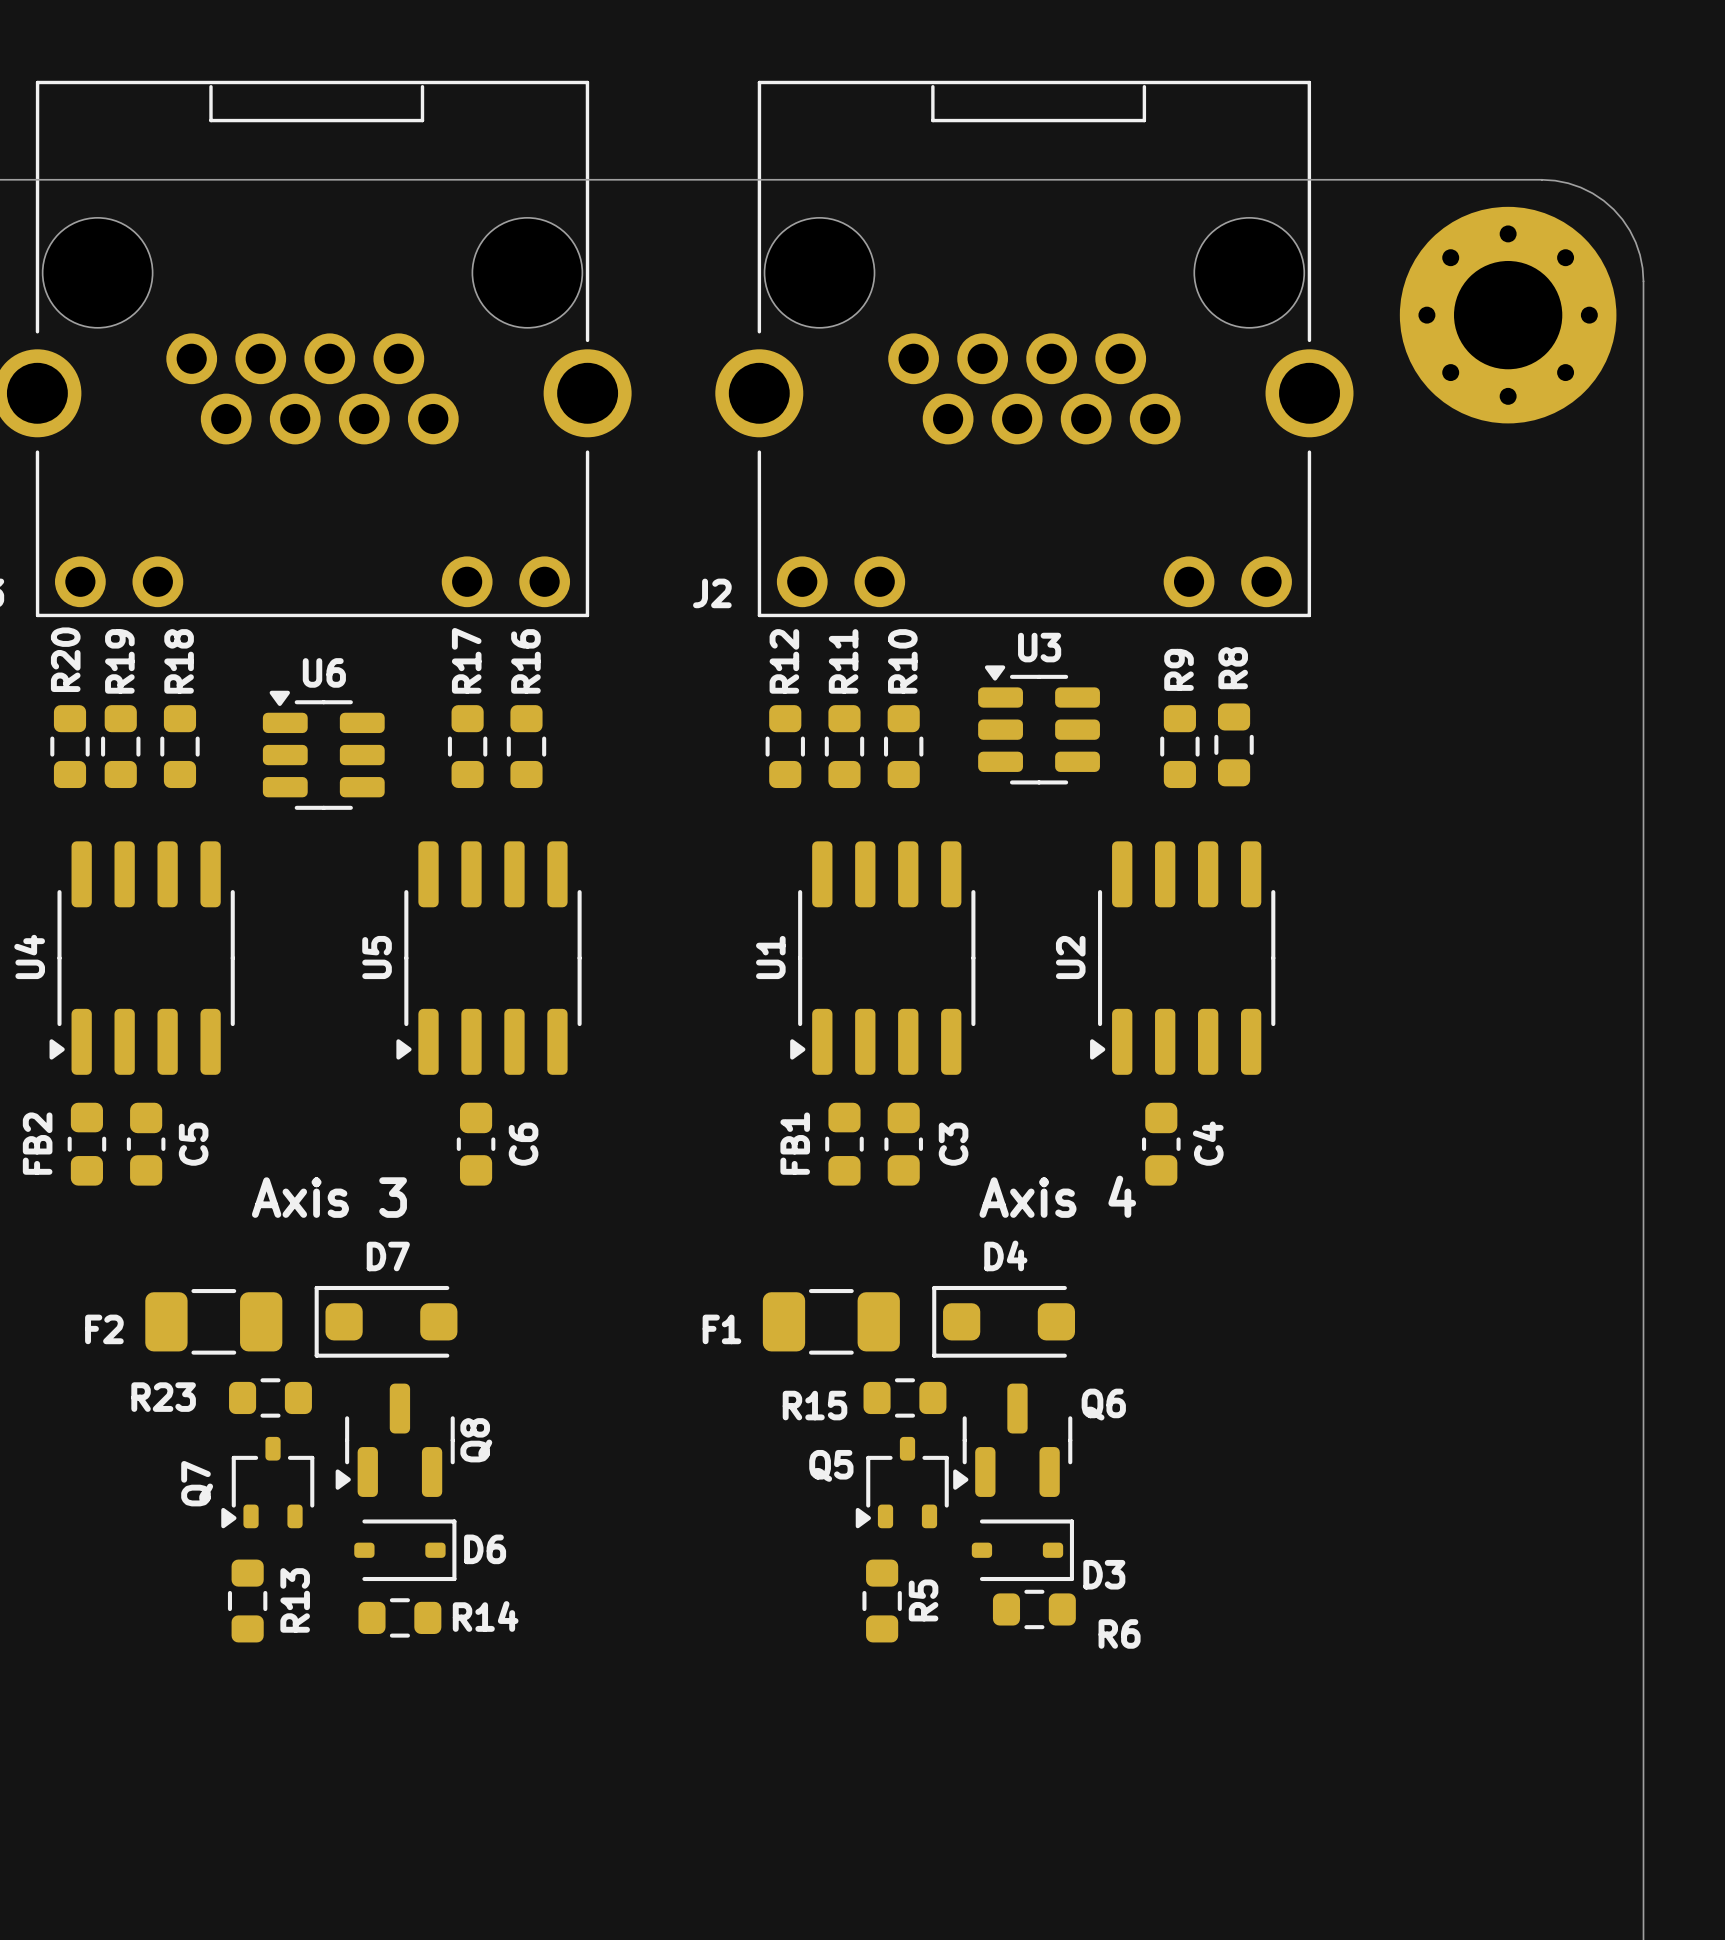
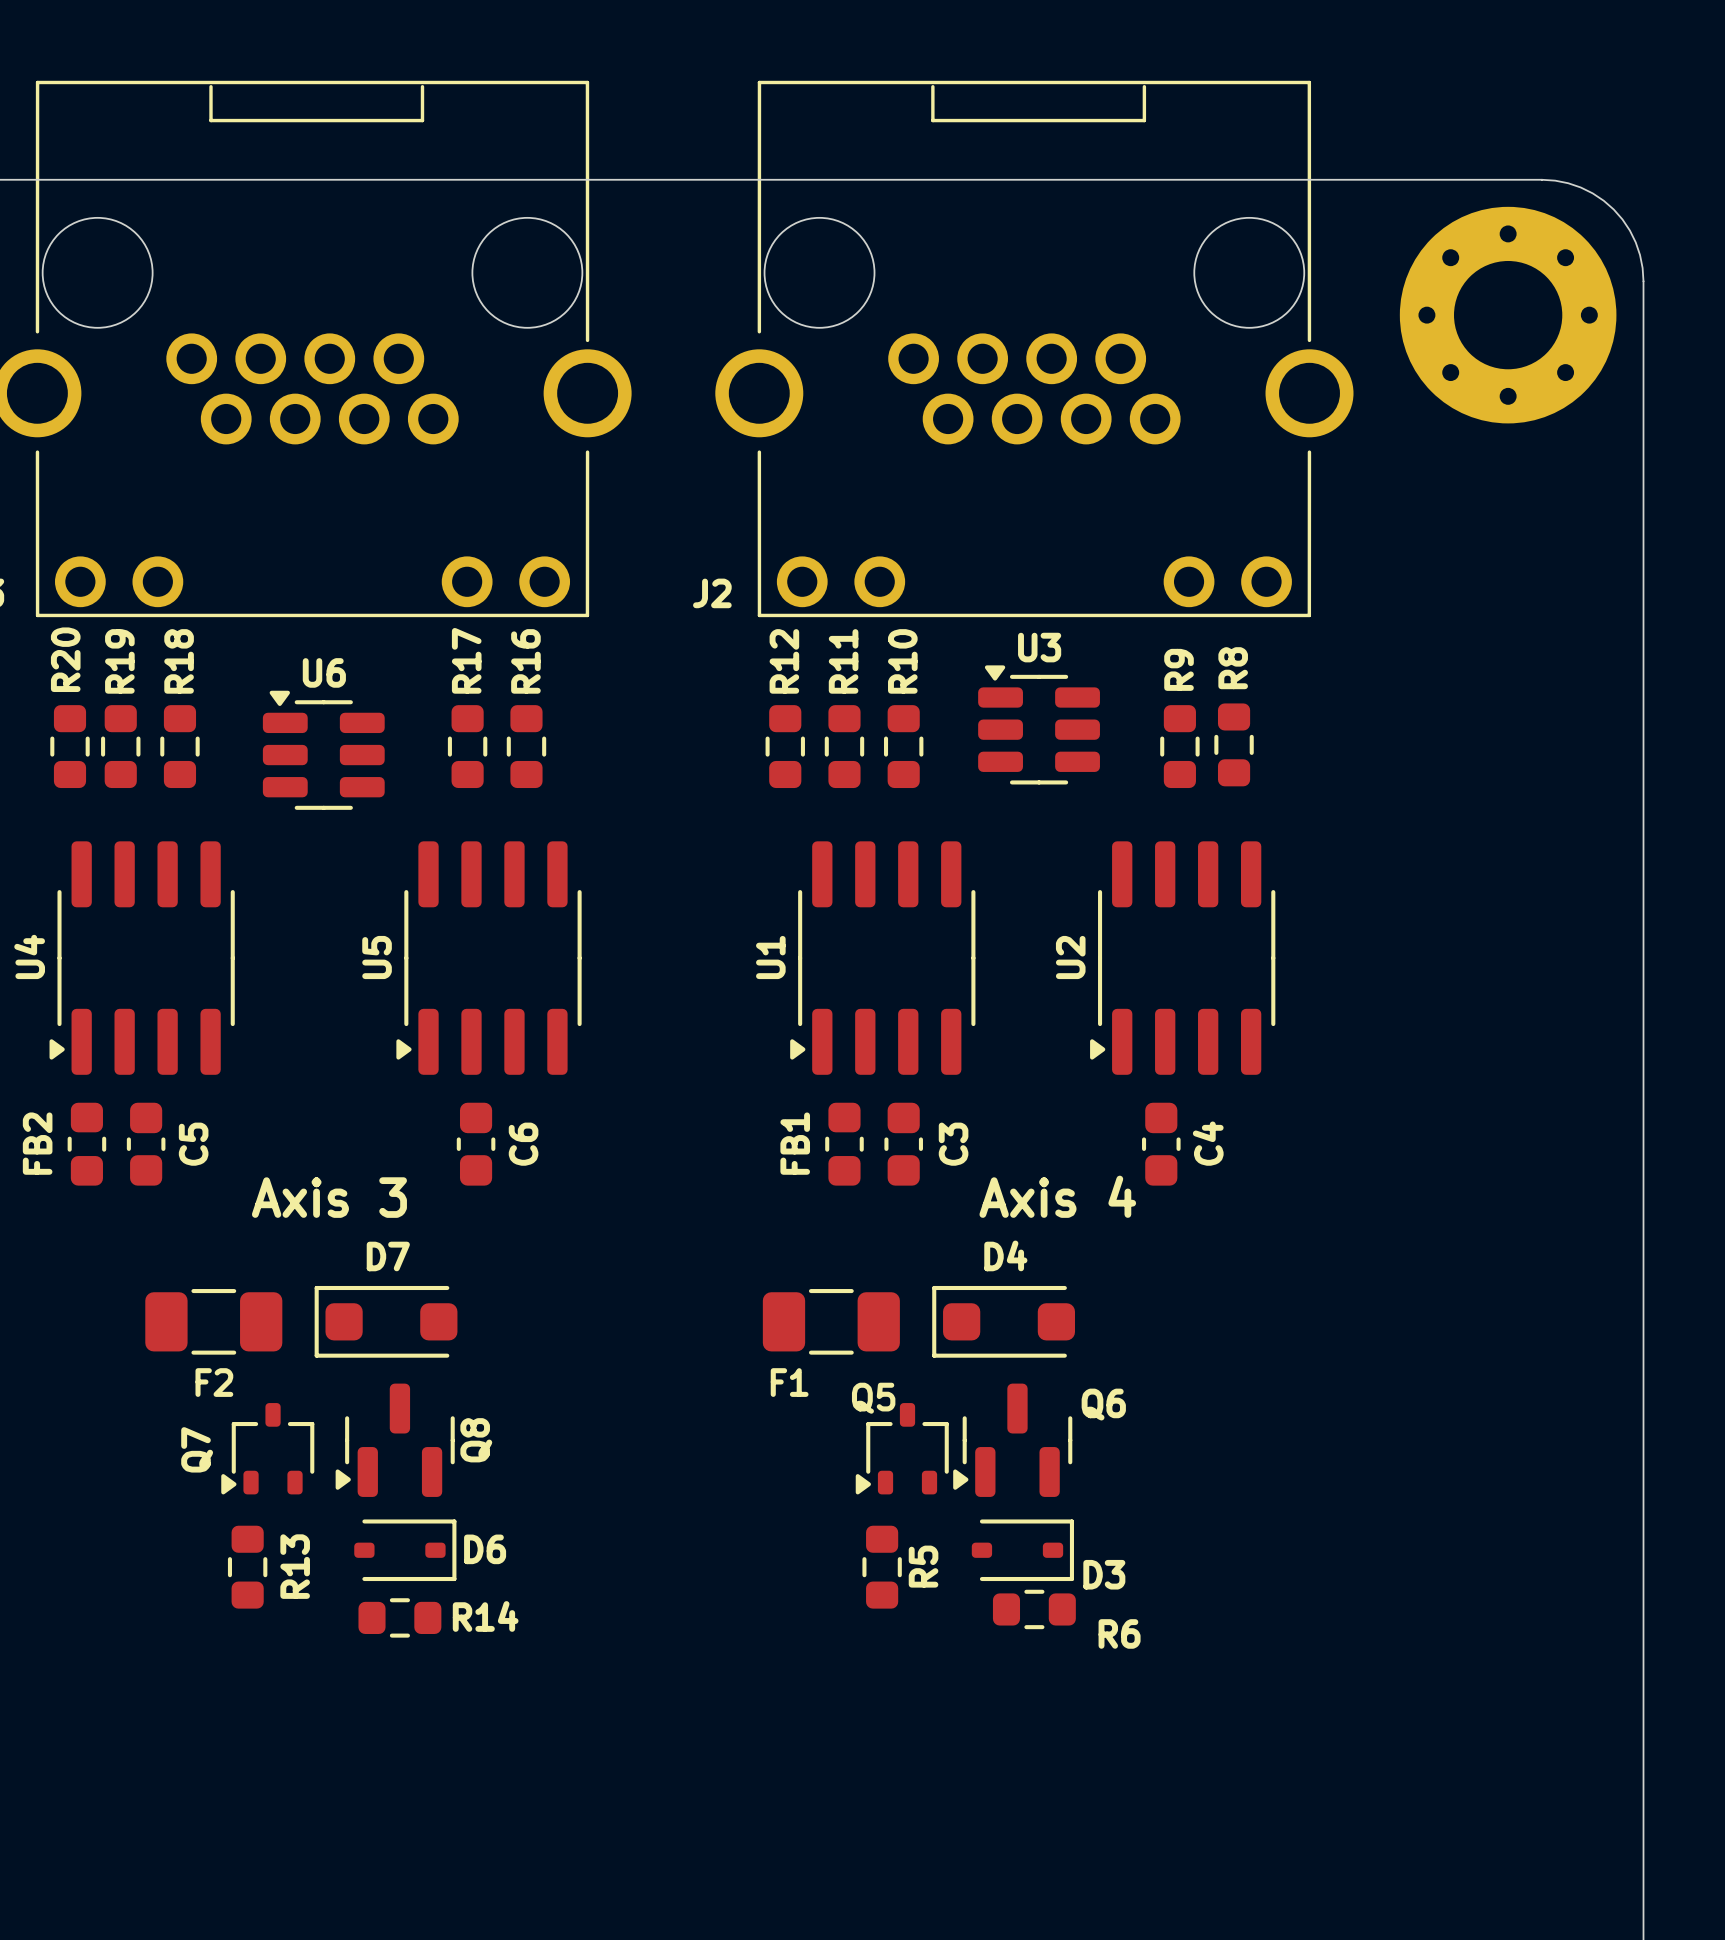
F2 name position: F2 (104, 1329) -> F2 (214, 1382)
F1 name position: F1 (721, 1329) -> F1 (789, 1382)
R23: (270, 1397) -> none
R15: (904, 1397) -> none
Q5 name position: Q5 (831, 1465) -> Q5 (873, 1398)
Q7 position: (267, 1482) -> (267, 1448)
Q5 position: (902, 1482) -> (902, 1448)
R13 position: (247, 1601) -> (247, 1567)
R5 position: (882, 1601) -> (882, 1567)

